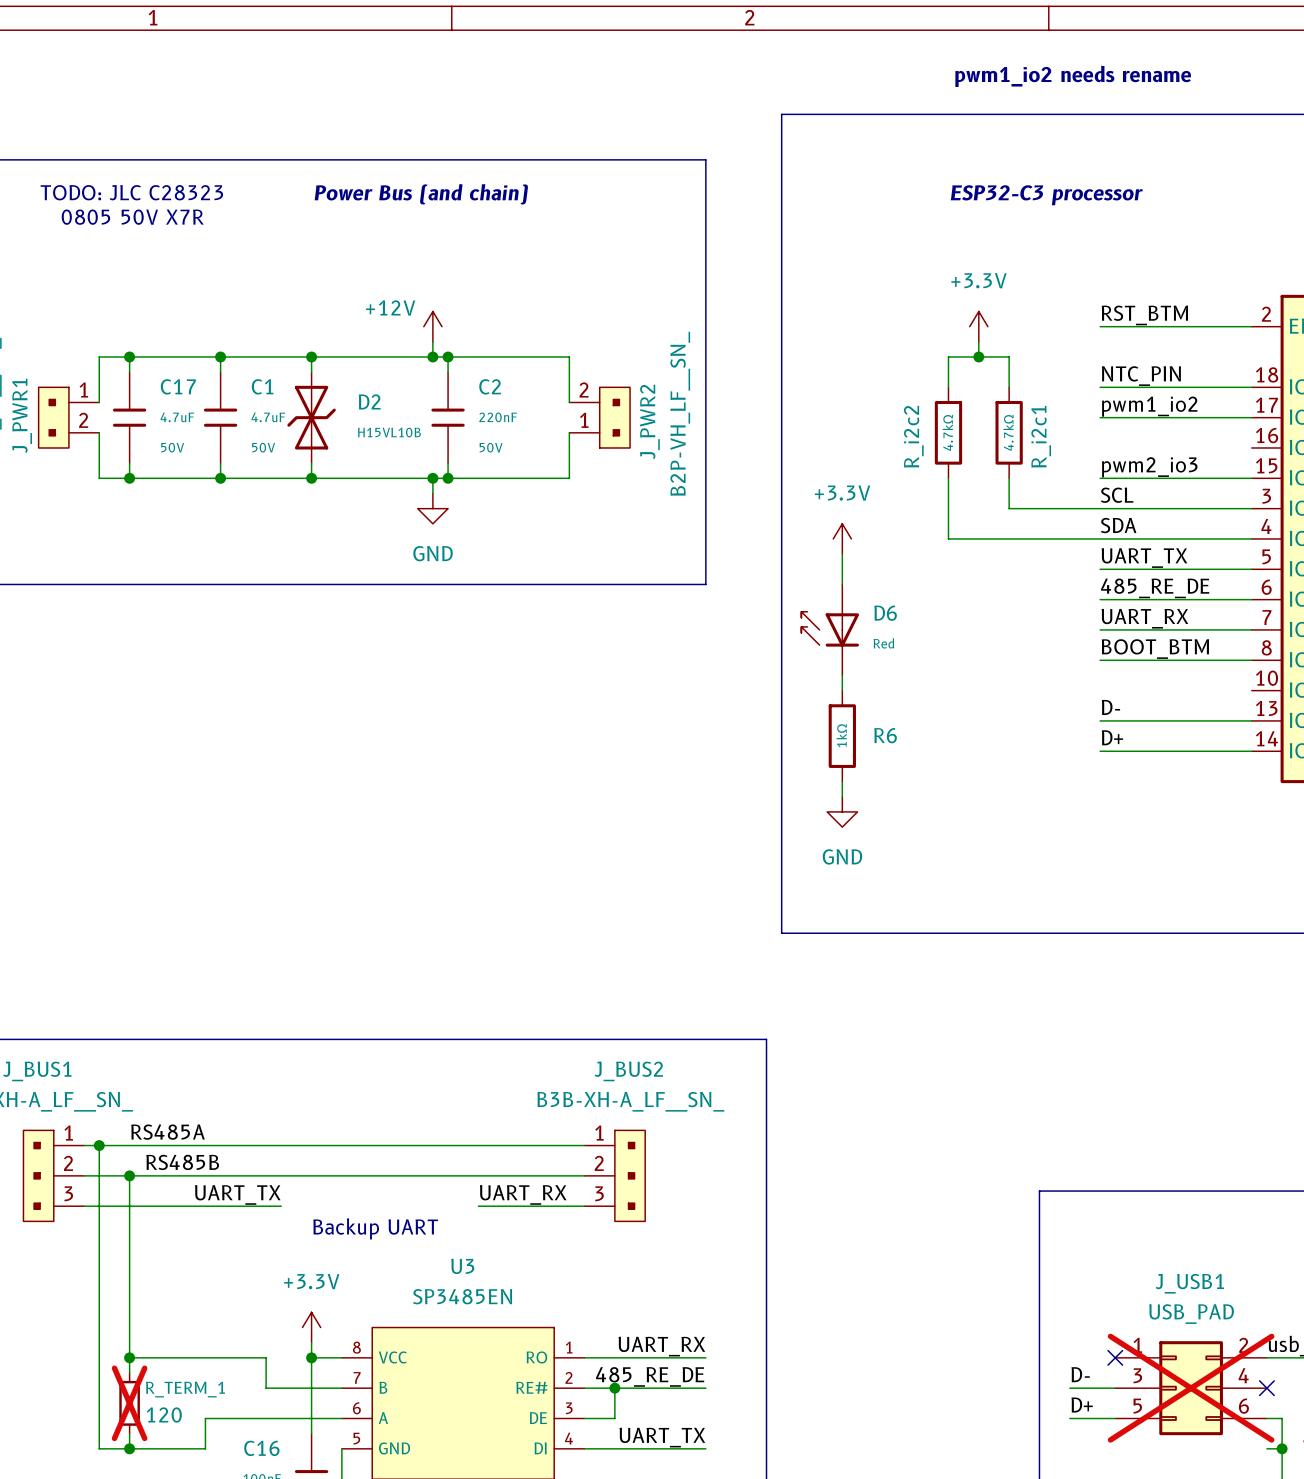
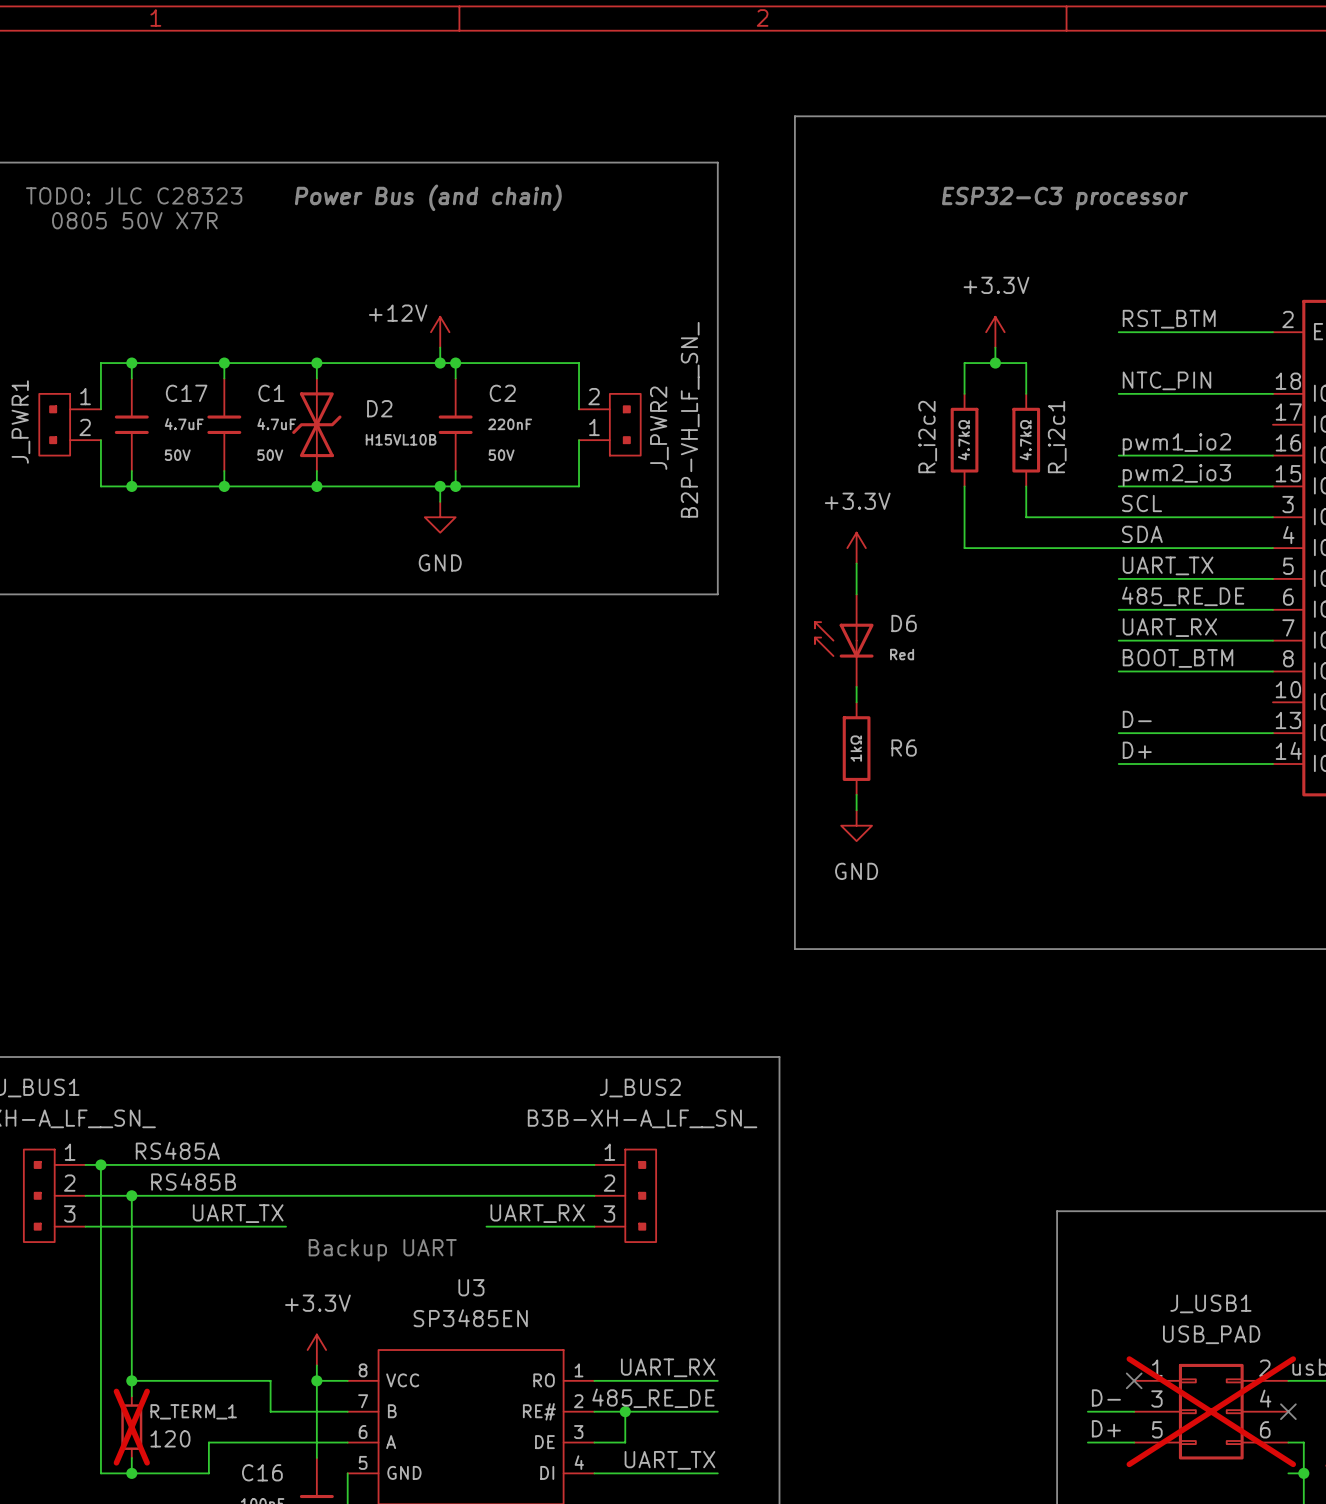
text: pwm1_io2 needs rename (1073, 76) -> none
label position: pwm1_io2 (1149, 406) -> pwm1_io2 (1176, 444)
wire: (1100, 417) (1251, 417) -> (1118, 455) (1272, 455)

